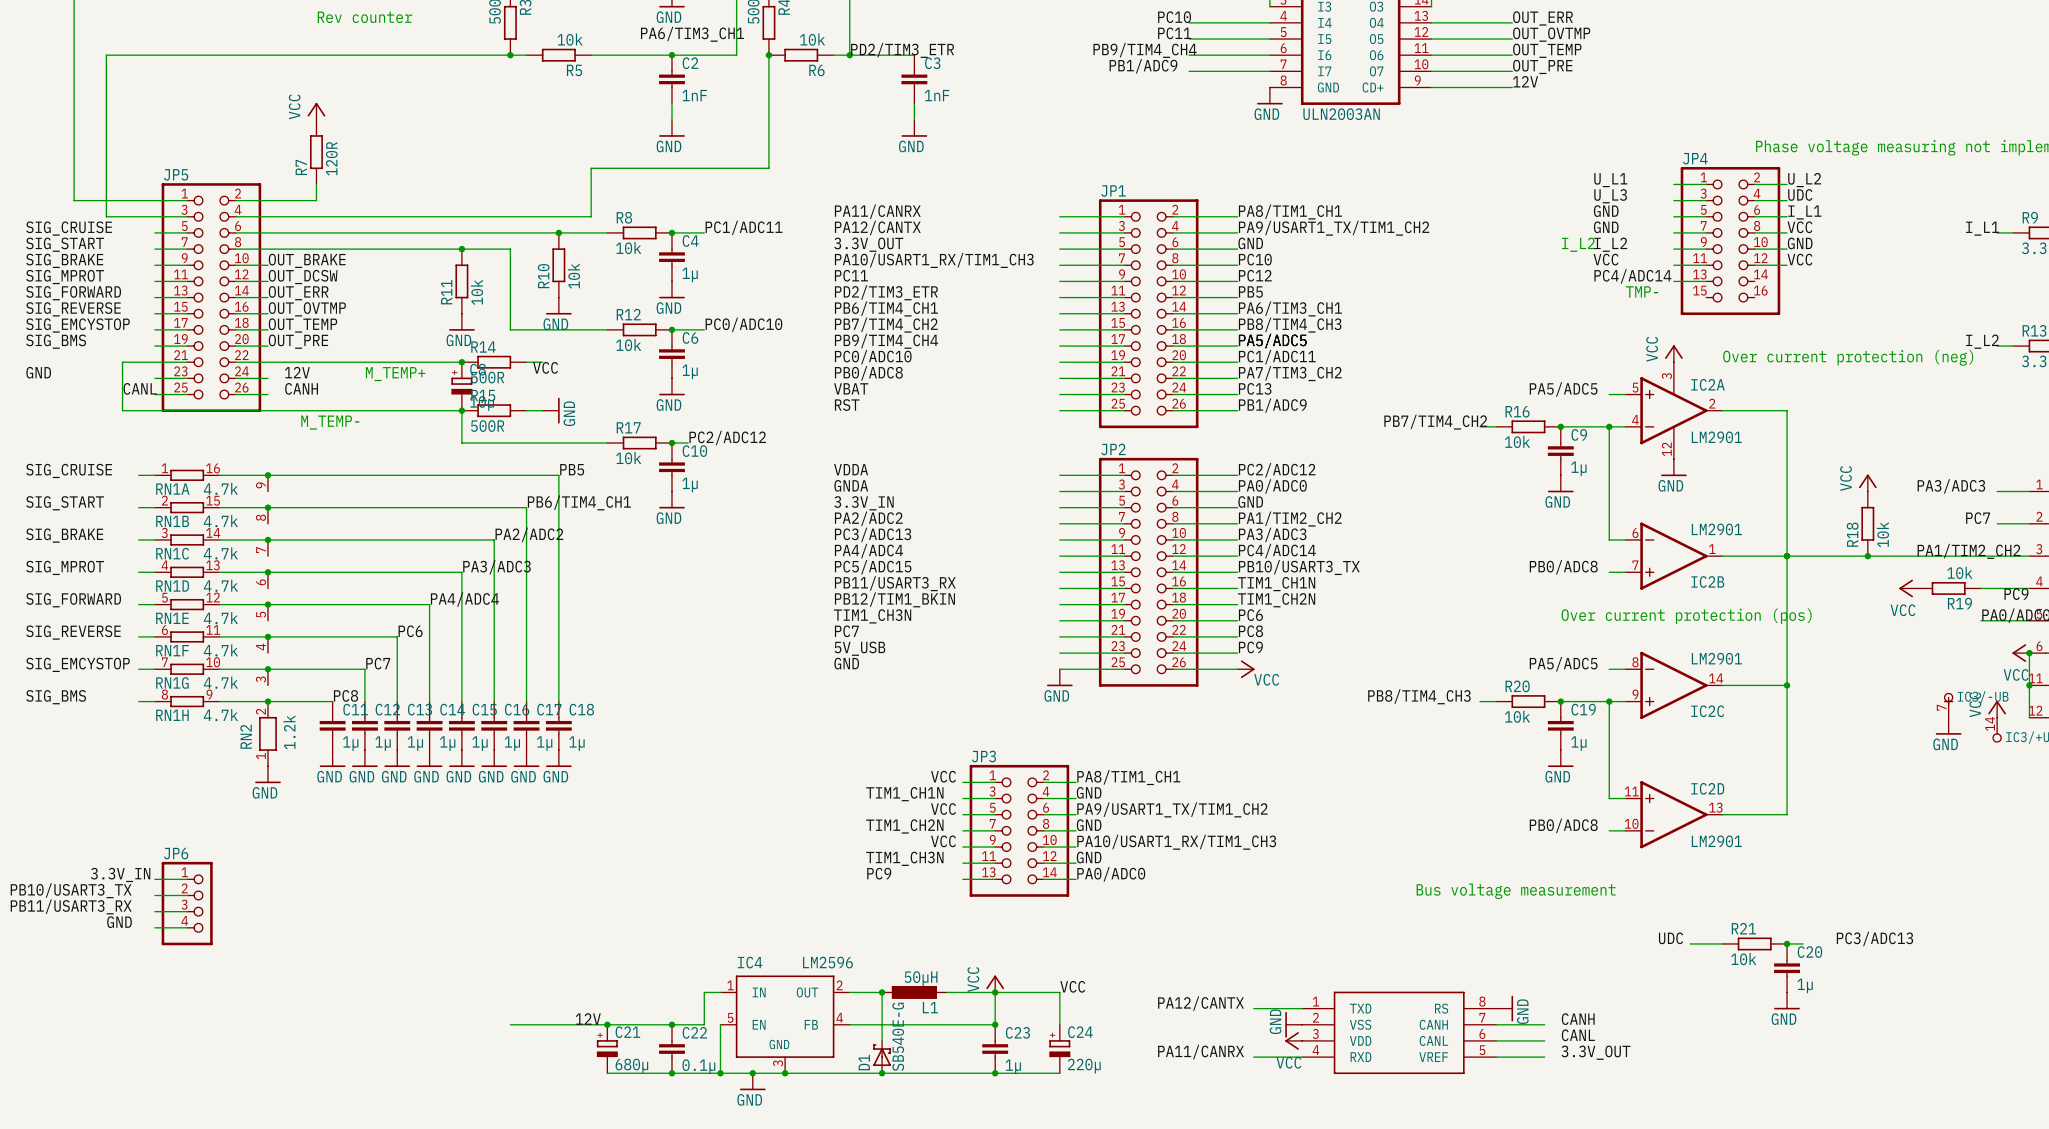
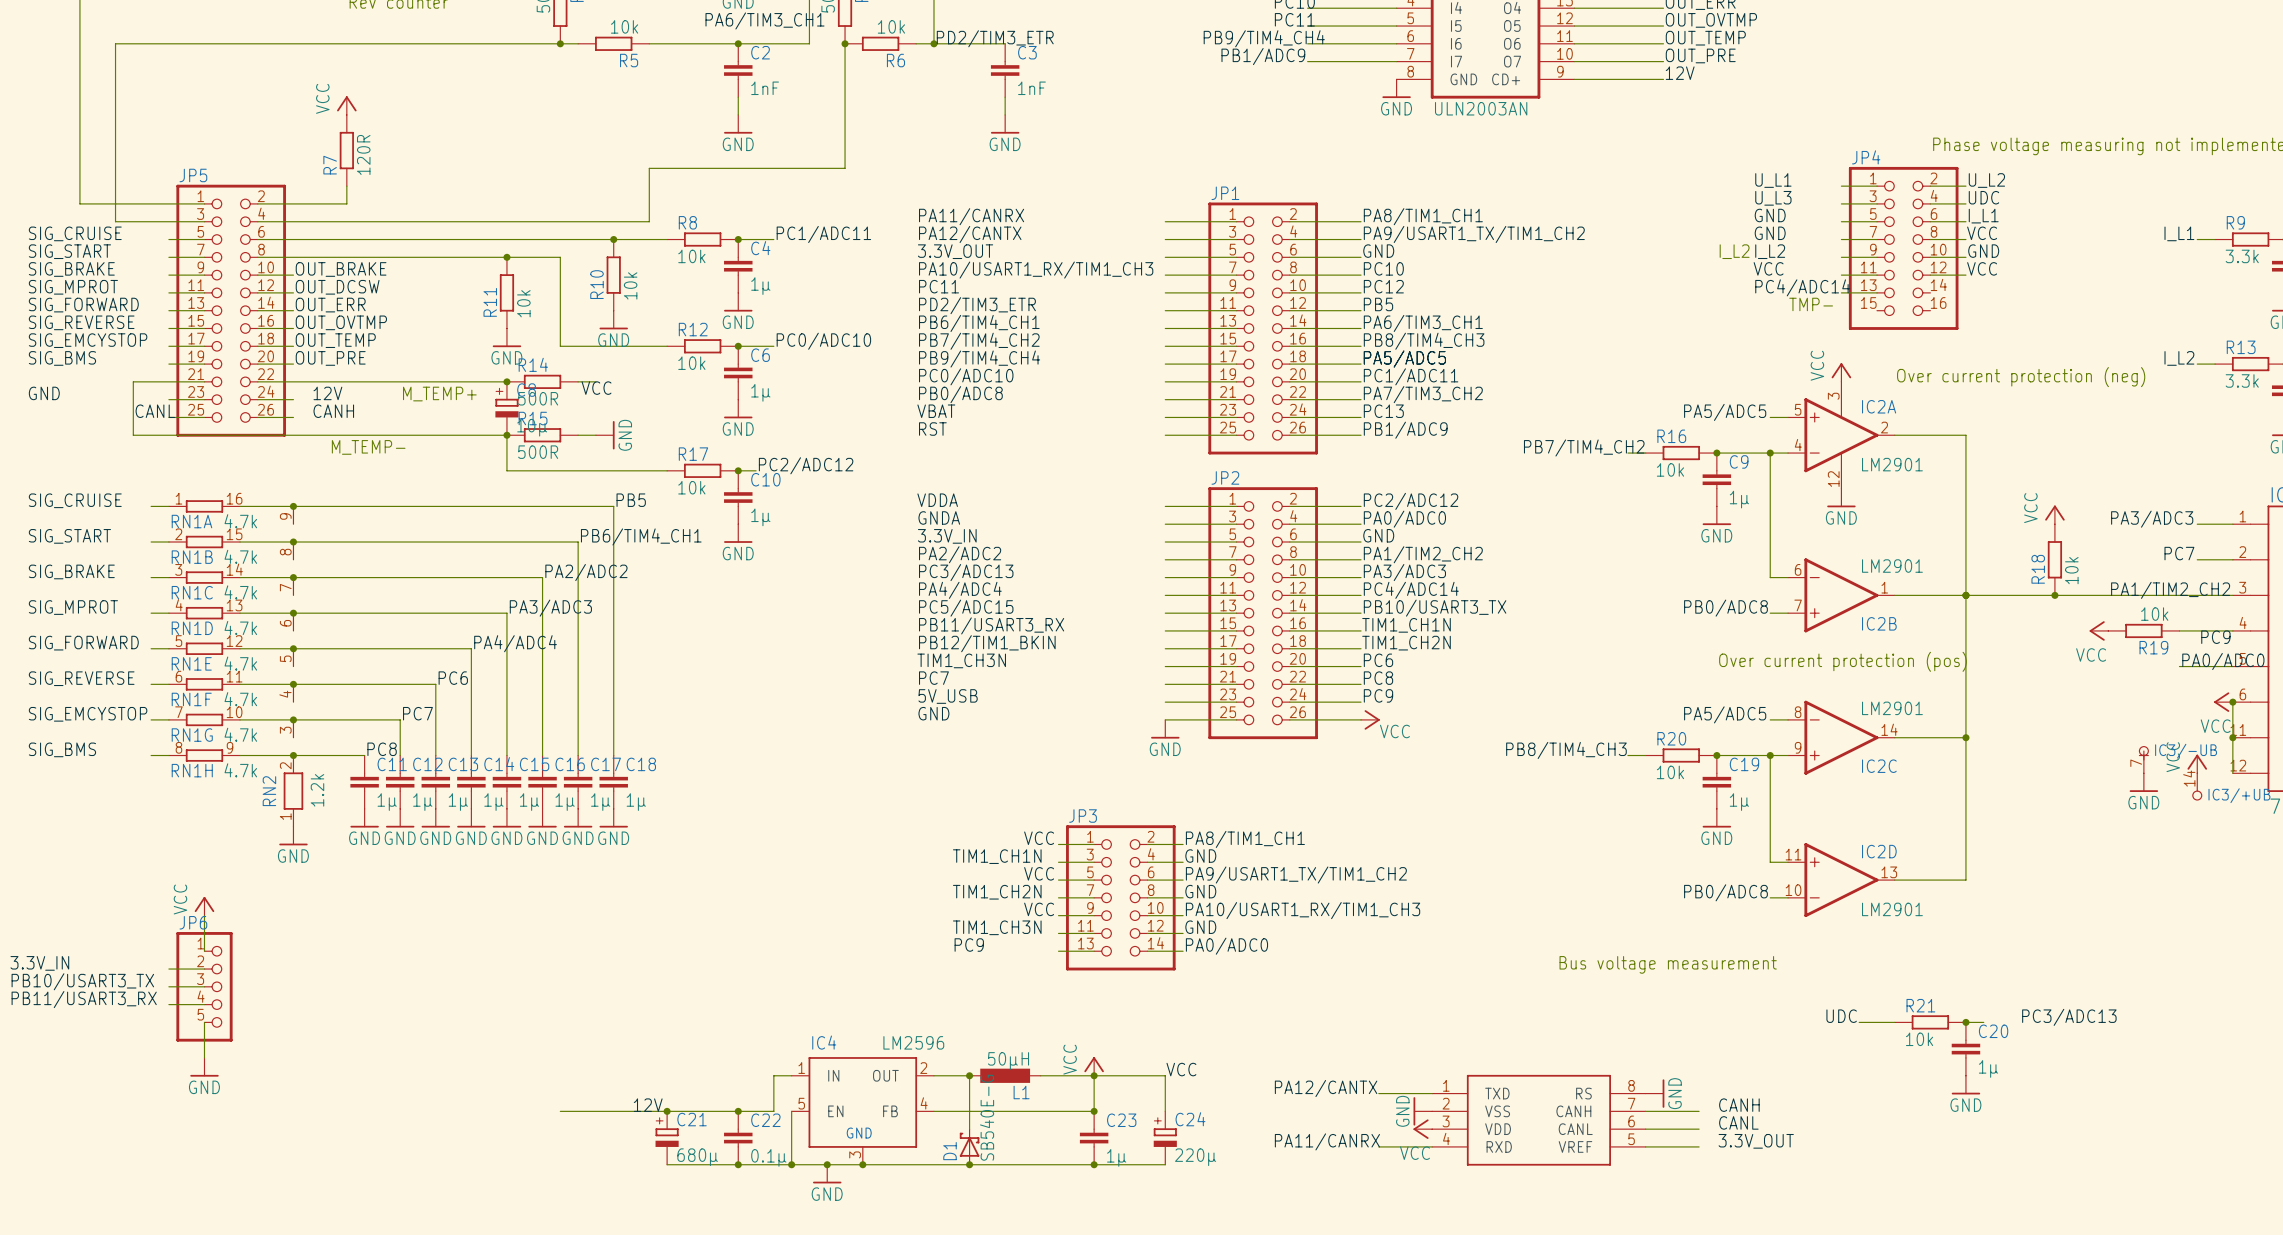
power symbol: none -> VCC (204, 906)
JP6 symbol: [161, 861, 213, 946] -> [176, 932, 233, 1042]
label: 3.3V_IN (120, 874) -> none
wire: (154, 879) (187, 879) -> (204, 915) (204, 951)
label: PB10/USART3_TX (71, 890) -> 3.3V_IN (39, 963)
label: PB11/USART3_RX (71, 906) -> PB10/USART3_TX (82, 981)
label: GND (119, 922) -> none
label: none -> PB11/USART3_RX (84, 999)
wire: none -> (204, 1022) (204, 1057)
power symbol: none -> GND (204, 1067)

